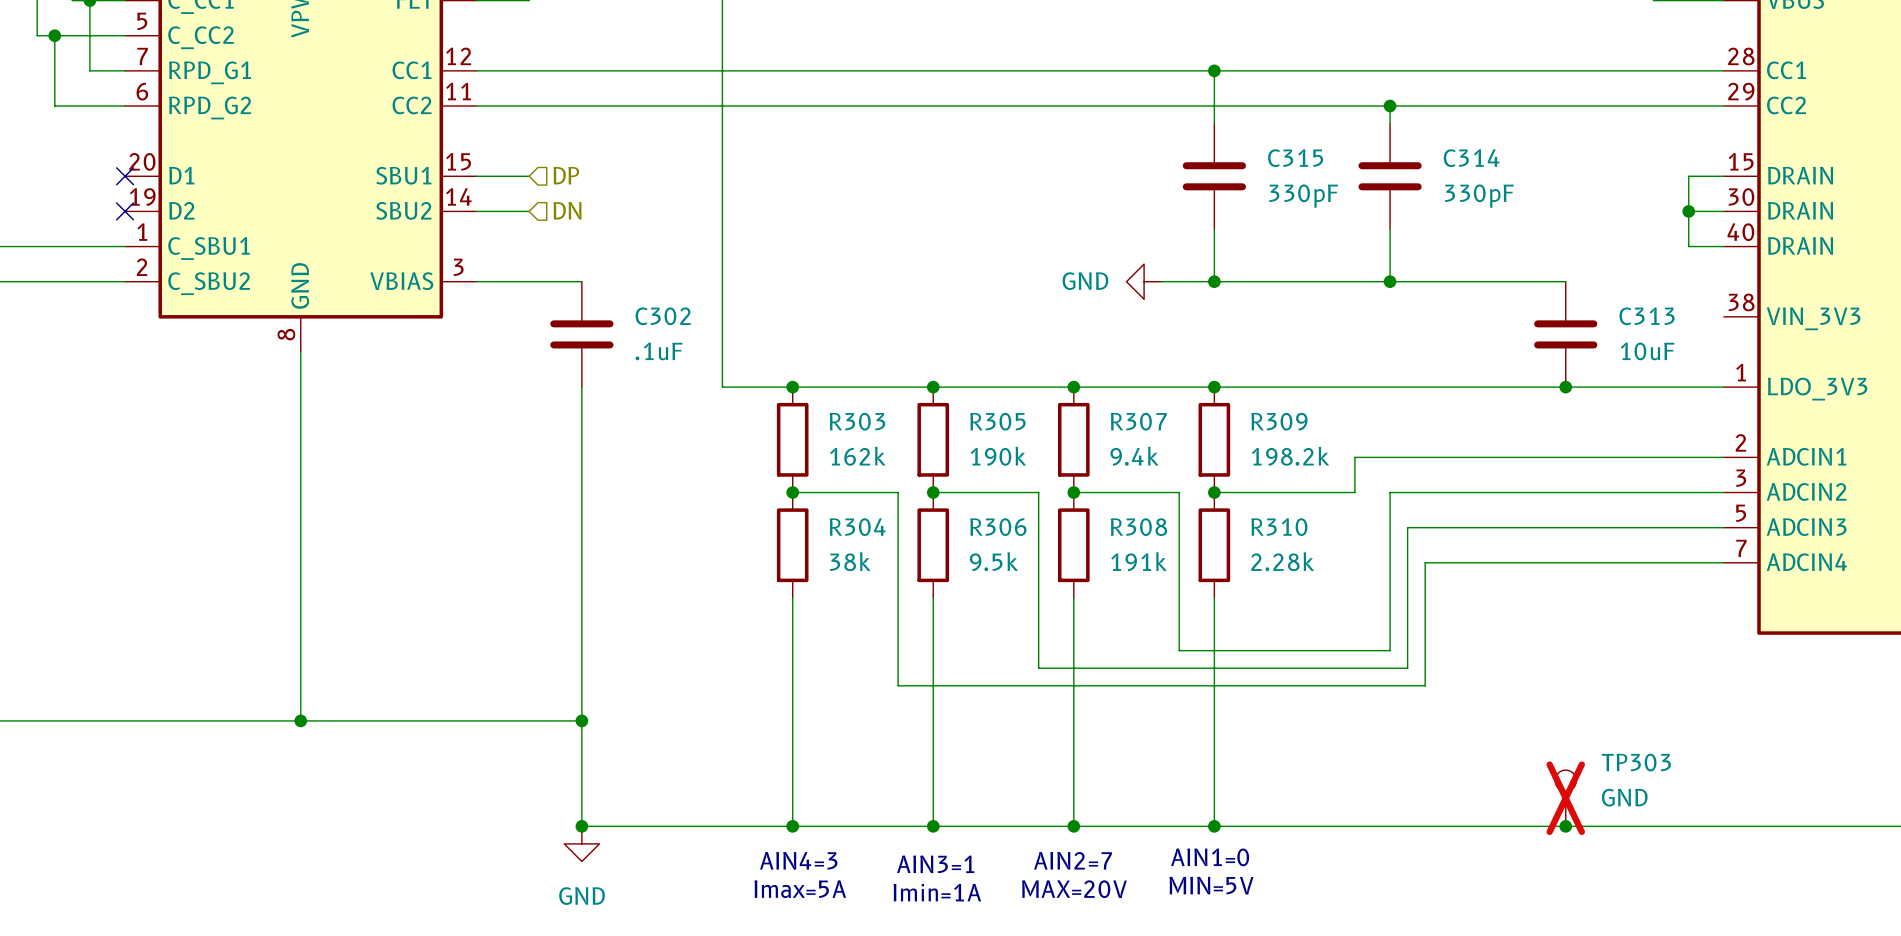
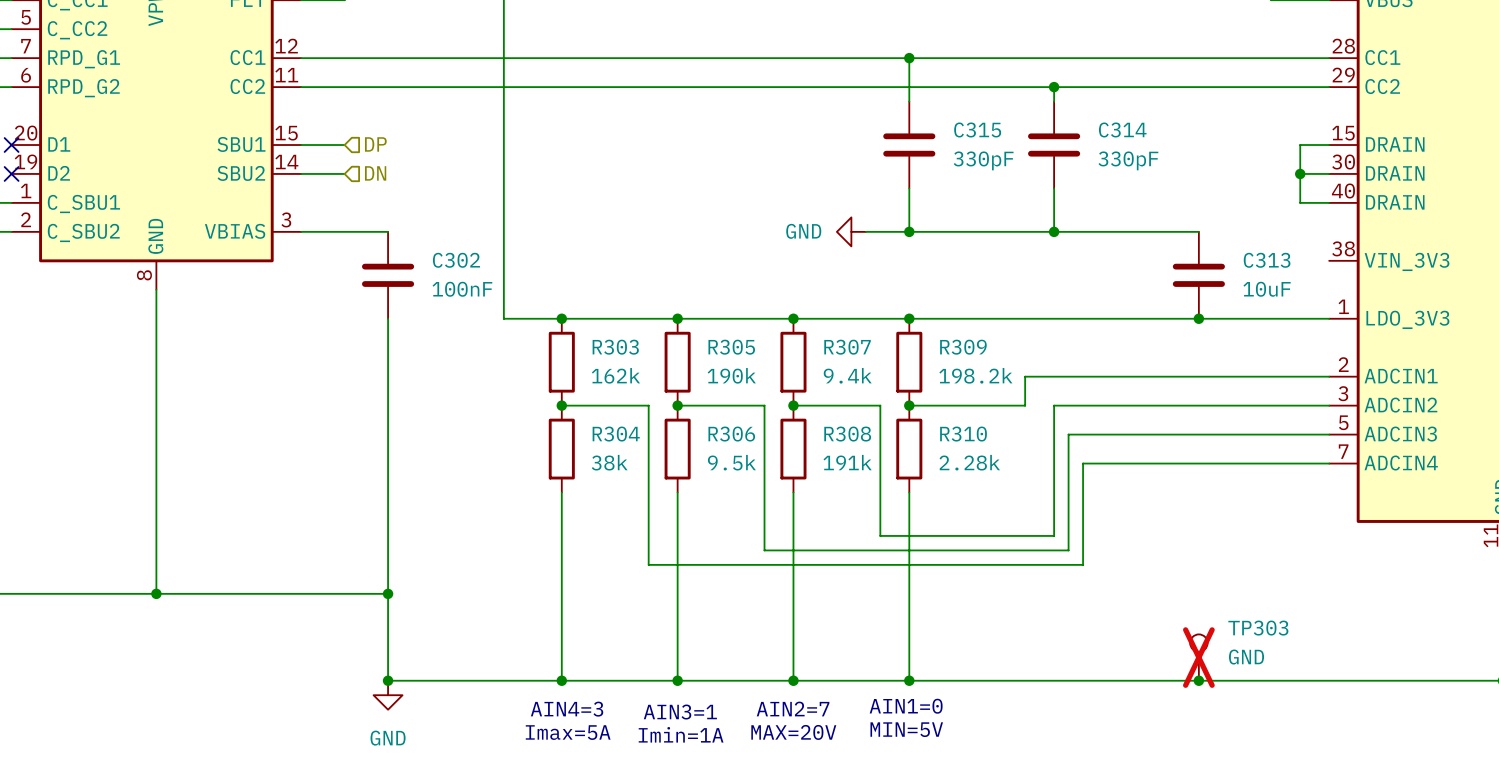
C302 value: .1uF (659, 351) -> 100nF (462, 289)

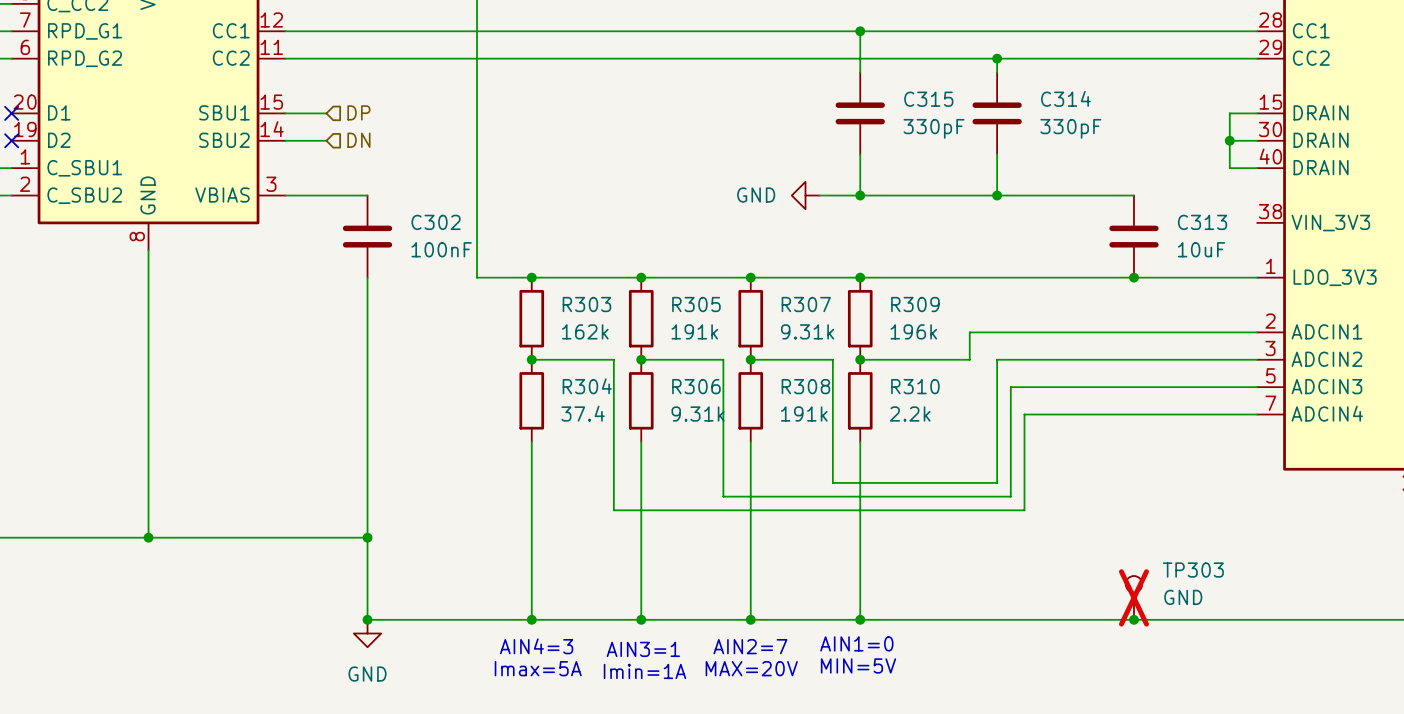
R305 value: 190k (731, 375) -> 191k (694, 331)
R307 value: 9.4k (847, 375) -> 9.31k (807, 331)
R309 value: 198.2k (975, 375) -> 196k (913, 331)
R304 value: 38k (609, 462) -> 37.4 (583, 413)
R306 value: 9.5k (731, 462) -> 9.31k (698, 414)
R310 value: 2.28k (969, 462) -> 2.2k (910, 414)

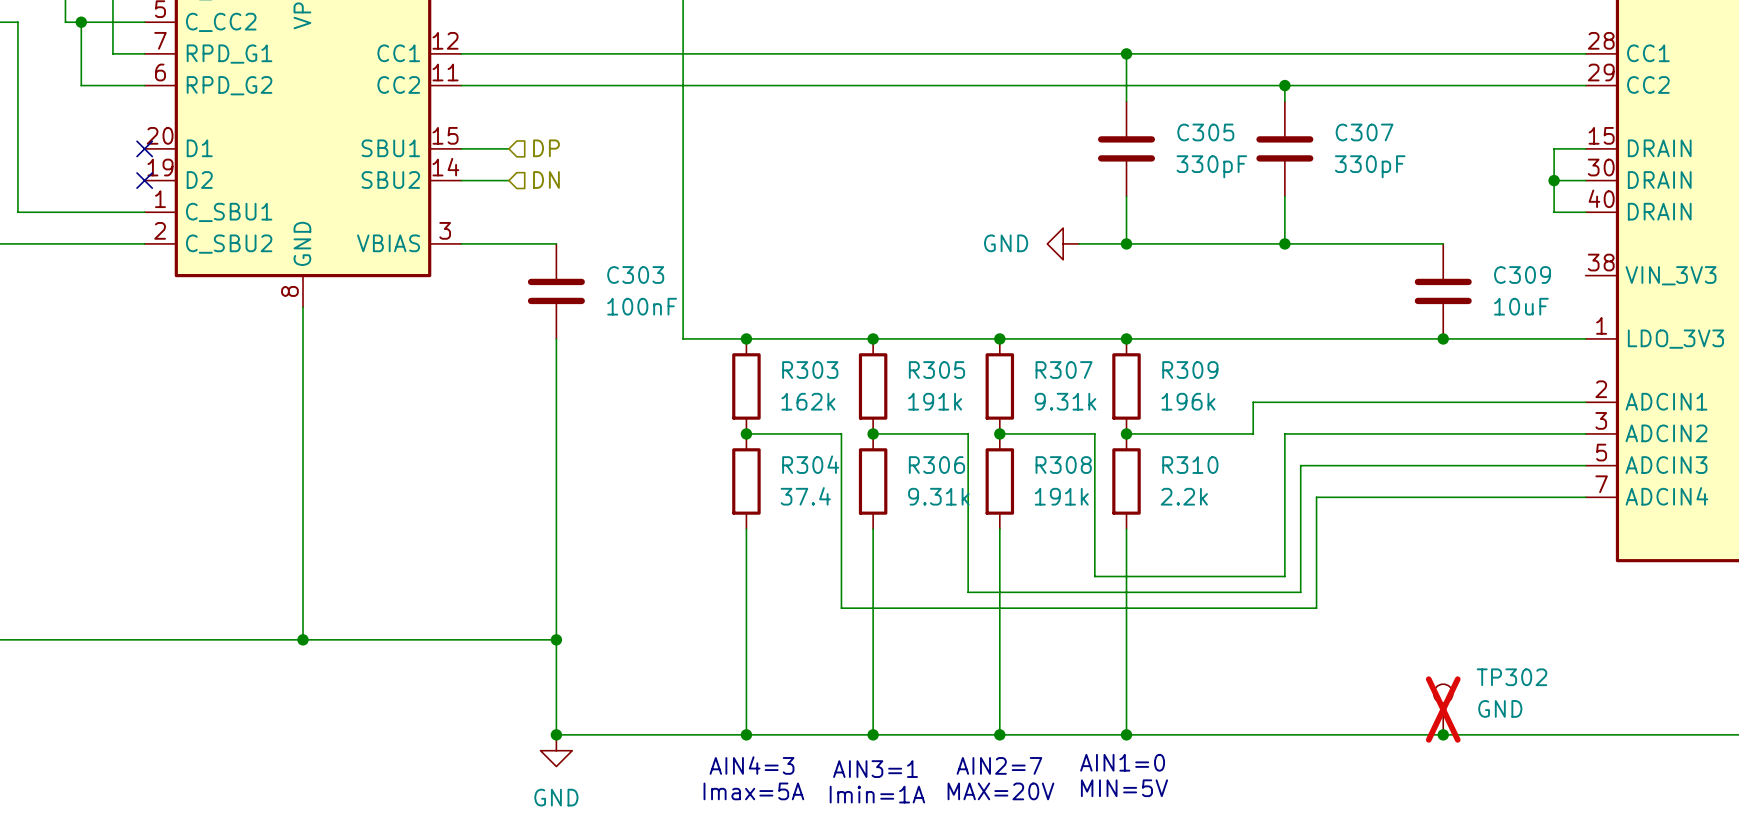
C314 name: C314 (1065, 98) -> C307 (1364, 132)
C315 name: C315 (928, 99) -> C305 (1205, 132)
C302 name: C302 (436, 222) -> C303 (635, 275)
C313 name: C313 (1202, 222) -> C309 (1522, 275)
TP303 name: TP303 (1193, 570) -> TP302 (1511, 677)

